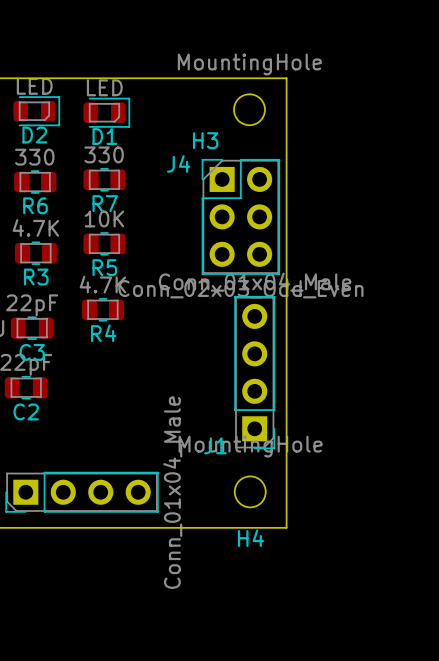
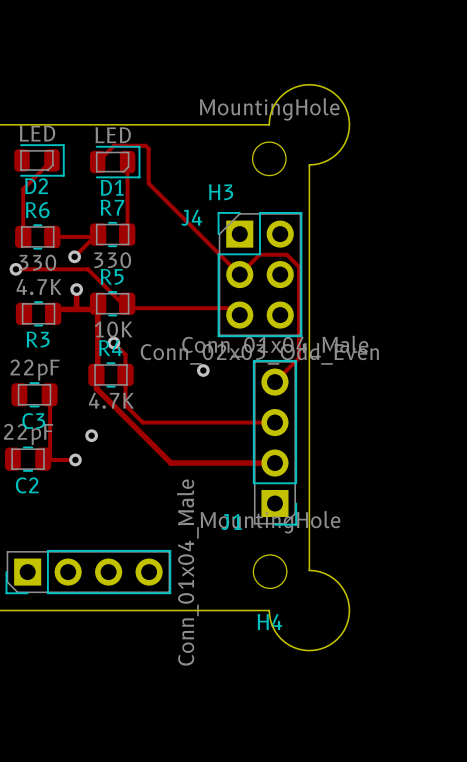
board edge: (249, 78) (286, 78) (286, 115) -> (269, 124) (274, 105) (283, 94) (291, 88) (306, 84) (315, 85) (329, 90) (337, 96) (346, 108) (348, 118) (347, 137) (339, 150) (332, 157) (323, 162) (309, 164)
track: none -> (51, 160) (23, 189) (23, 236)
track: none -> (97, 162) (114, 145) (145, 145) (148, 148) (148, 183) (239, 274) (259, 254) (286, 254) (298, 266) (298, 358) (274, 382)
track: none -> (127, 162) (127, 234)
R7 value position: 330 (104, 154) -> 330 (112, 260)
R6 value position: 330 (34, 157) -> 330 (37, 262)
track: none -> (52, 236) (95, 236) (98, 234) (96, 234) (74, 256)
via: none -> (74, 256)
R7 name position: R7 (105, 203) -> R7 (112, 207)
R6 name position: R6 (35, 205) -> R6 (37, 210)
track: none -> (15, 269) (87, 269) (126, 308) (232, 308) (239, 315)
via: none -> (15, 269)
R5 value position: 10K (104, 218) -> 10K (113, 329)
track: none -> (76, 289) (76, 309)
via: none -> (76, 289)
track: none -> (55, 309) (97, 308) (96, 388) (170, 463) (274, 463)
R5 name position: R5 (104, 267) -> R5 (112, 276)
track: none -> (113, 342) (125, 354) (125, 405) (142, 422) (274, 422)
via: none -> (113, 342)
R4 value position: 4.7K (102, 284) -> 4.7K (111, 400)
via: none -> (203, 370)
track: none -> (49, 394) (50, 459) (75, 459)
R4 name position: R4 (103, 333) -> R4 (110, 348)
via: none -> (91, 435)
via: none -> (75, 459)
board edge: (286, 490) (286, 527) (249, 527) -> (309, 570) (329, 575) (337, 582) (346, 595) (349, 605) (348, 620) (337, 638) (319, 649) (309, 650) (294, 647) (277, 634) (272, 625) (269, 610)

